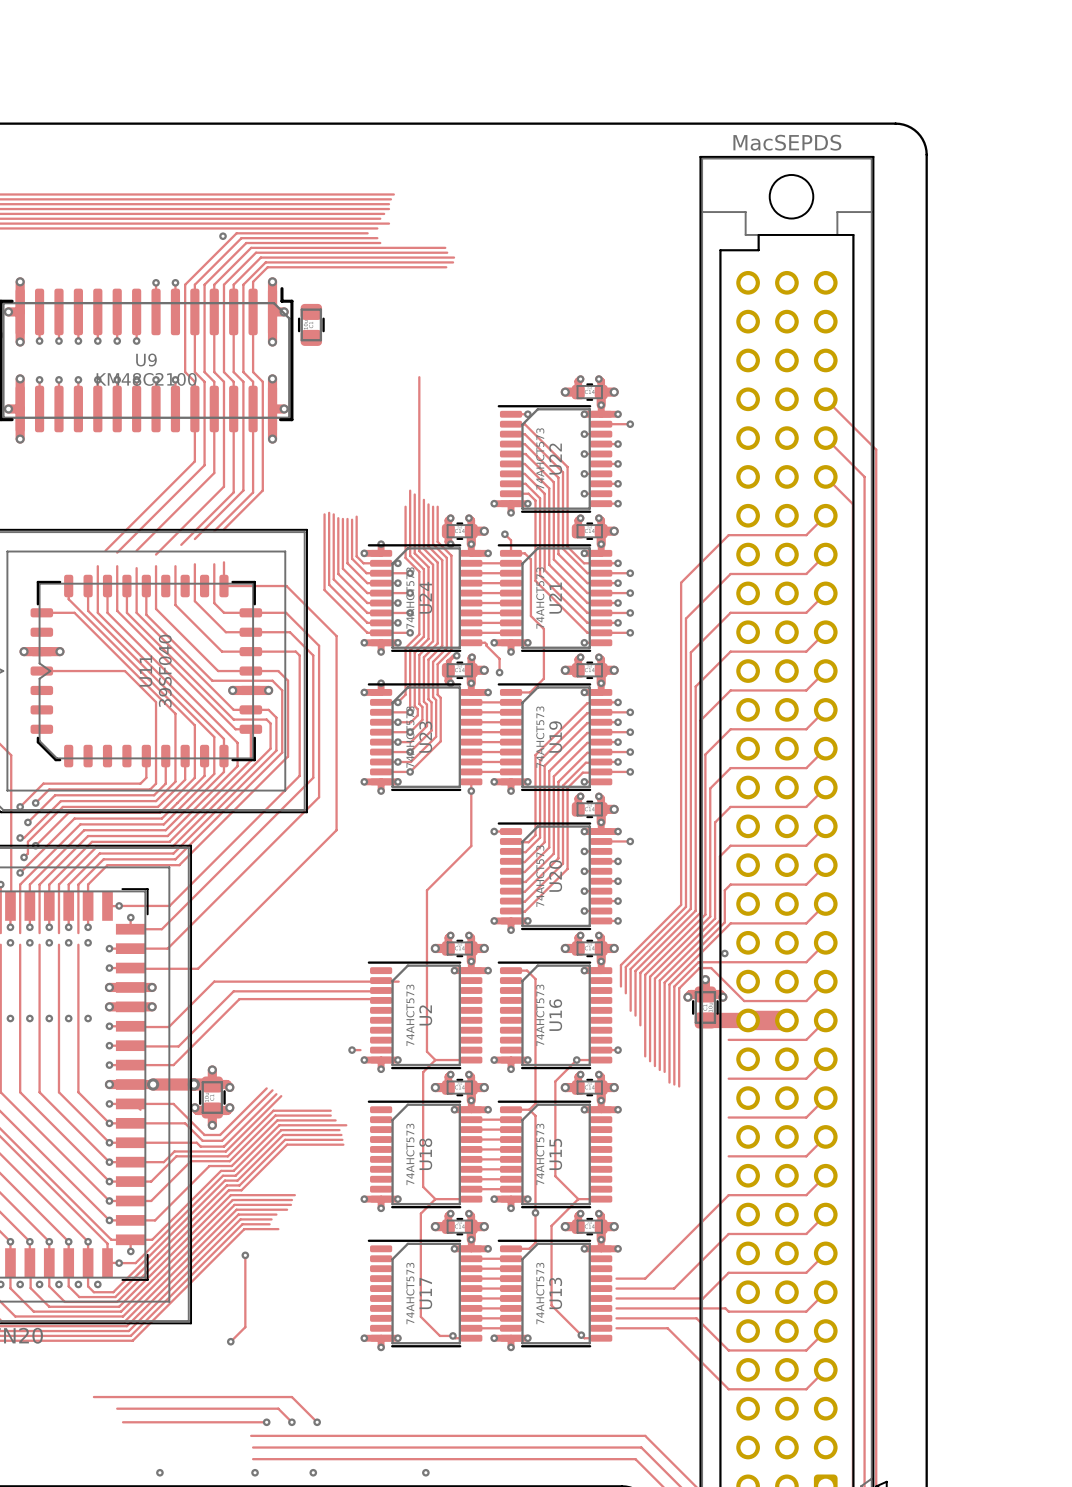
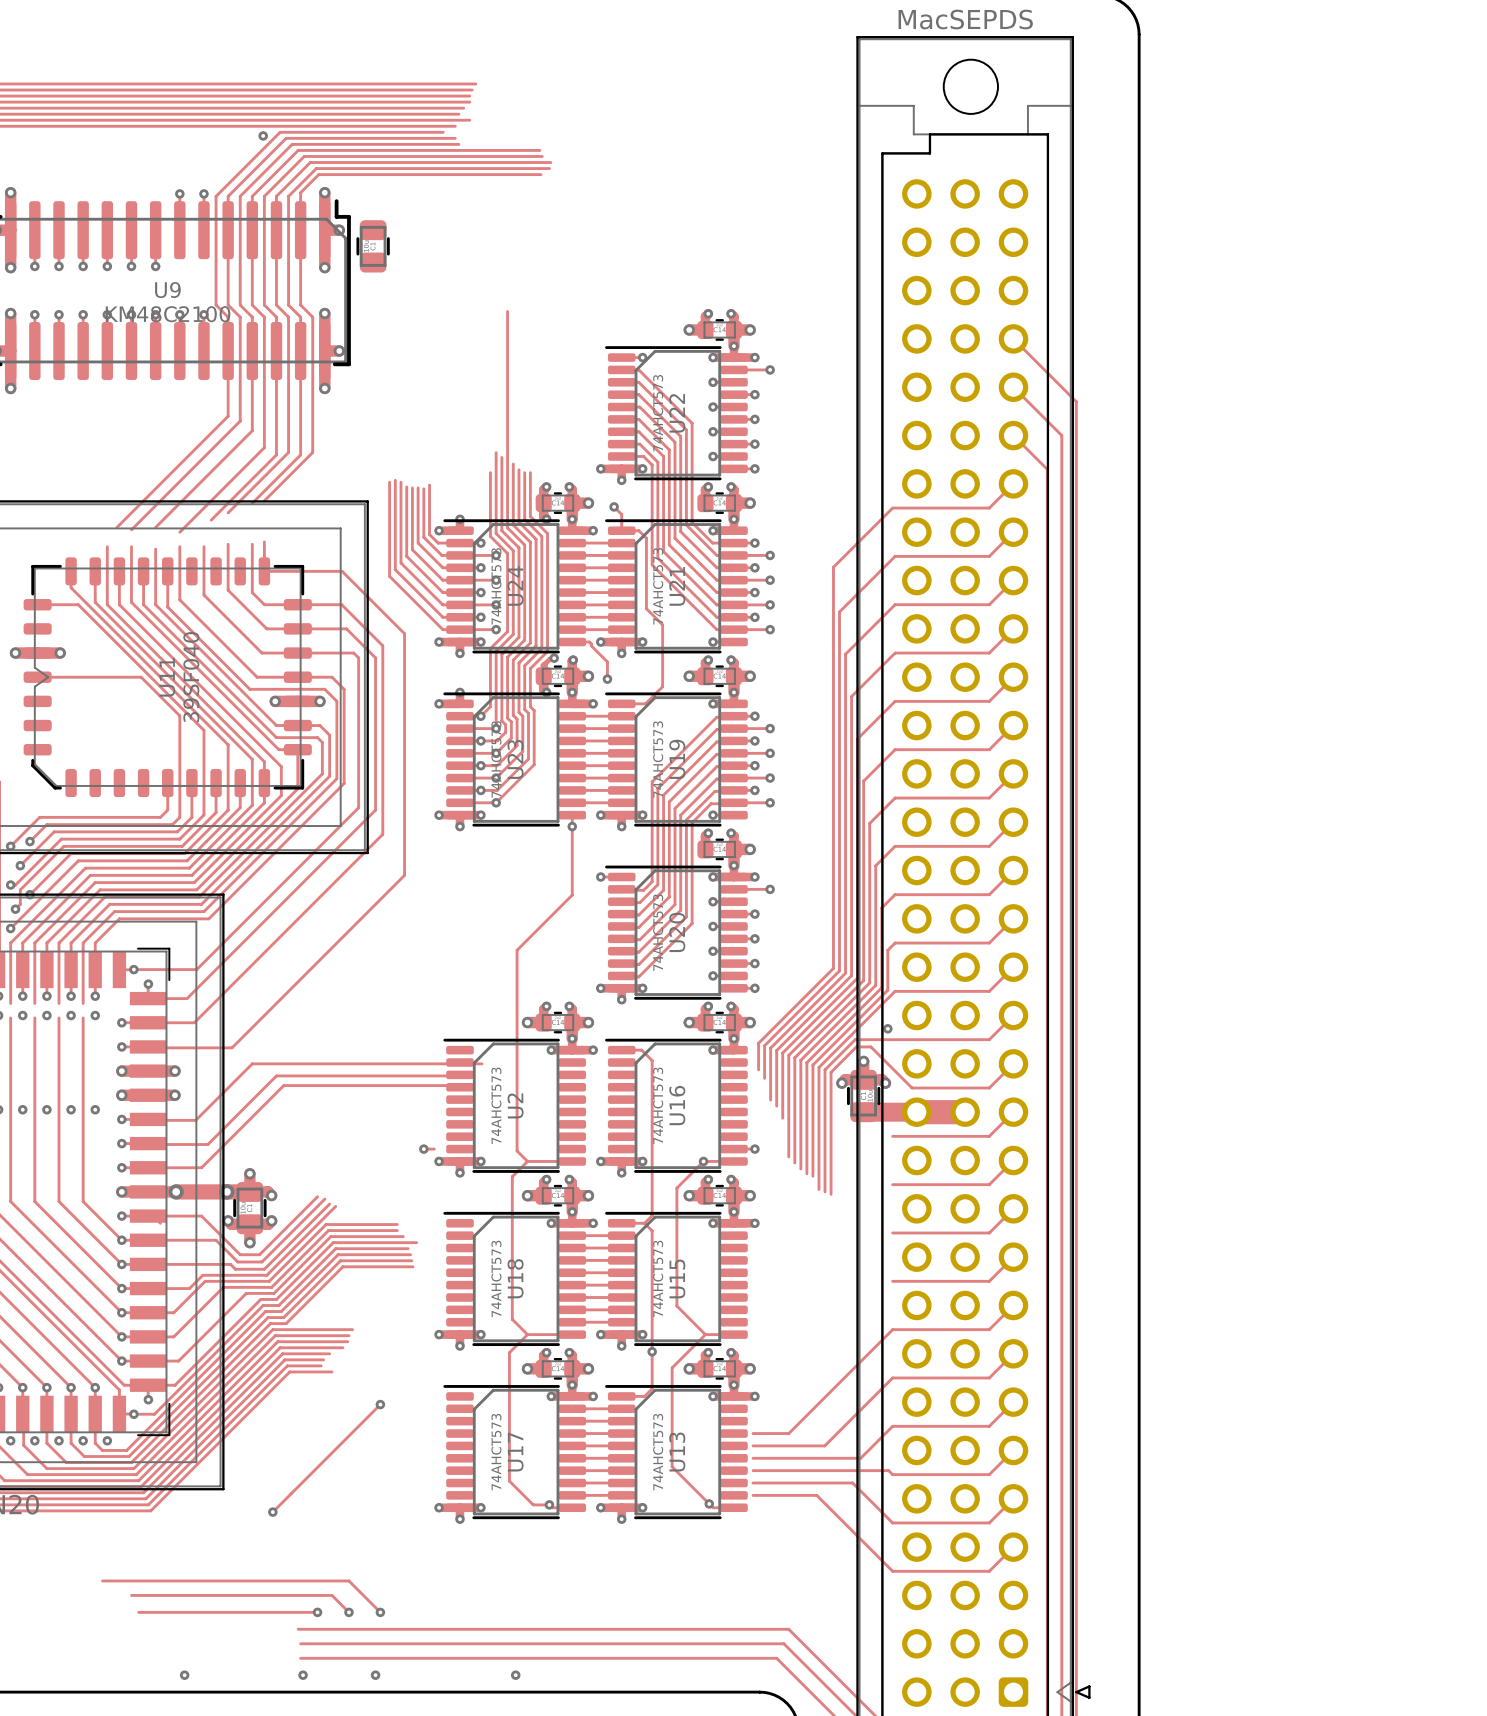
track: (245, 1255) (245, 1327) -> (380, 1404) (290, 1493)
via position: (245, 1255) -> (380, 1404)

